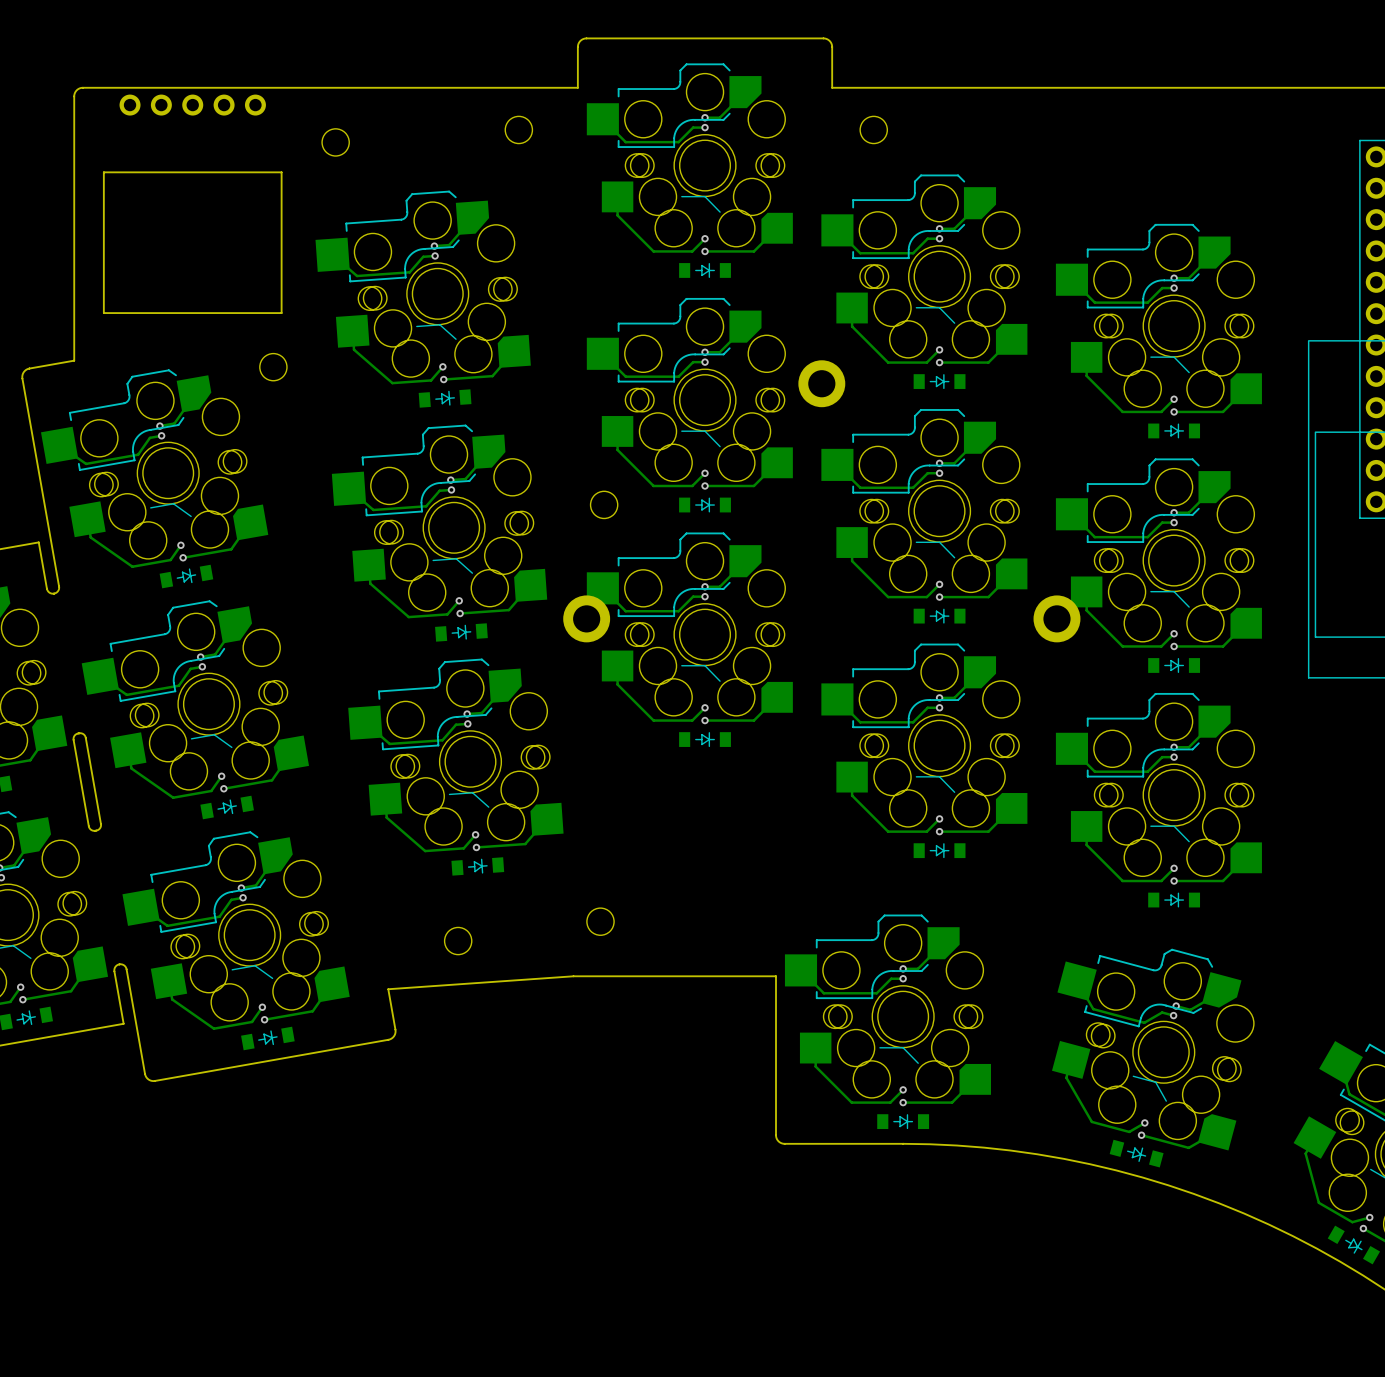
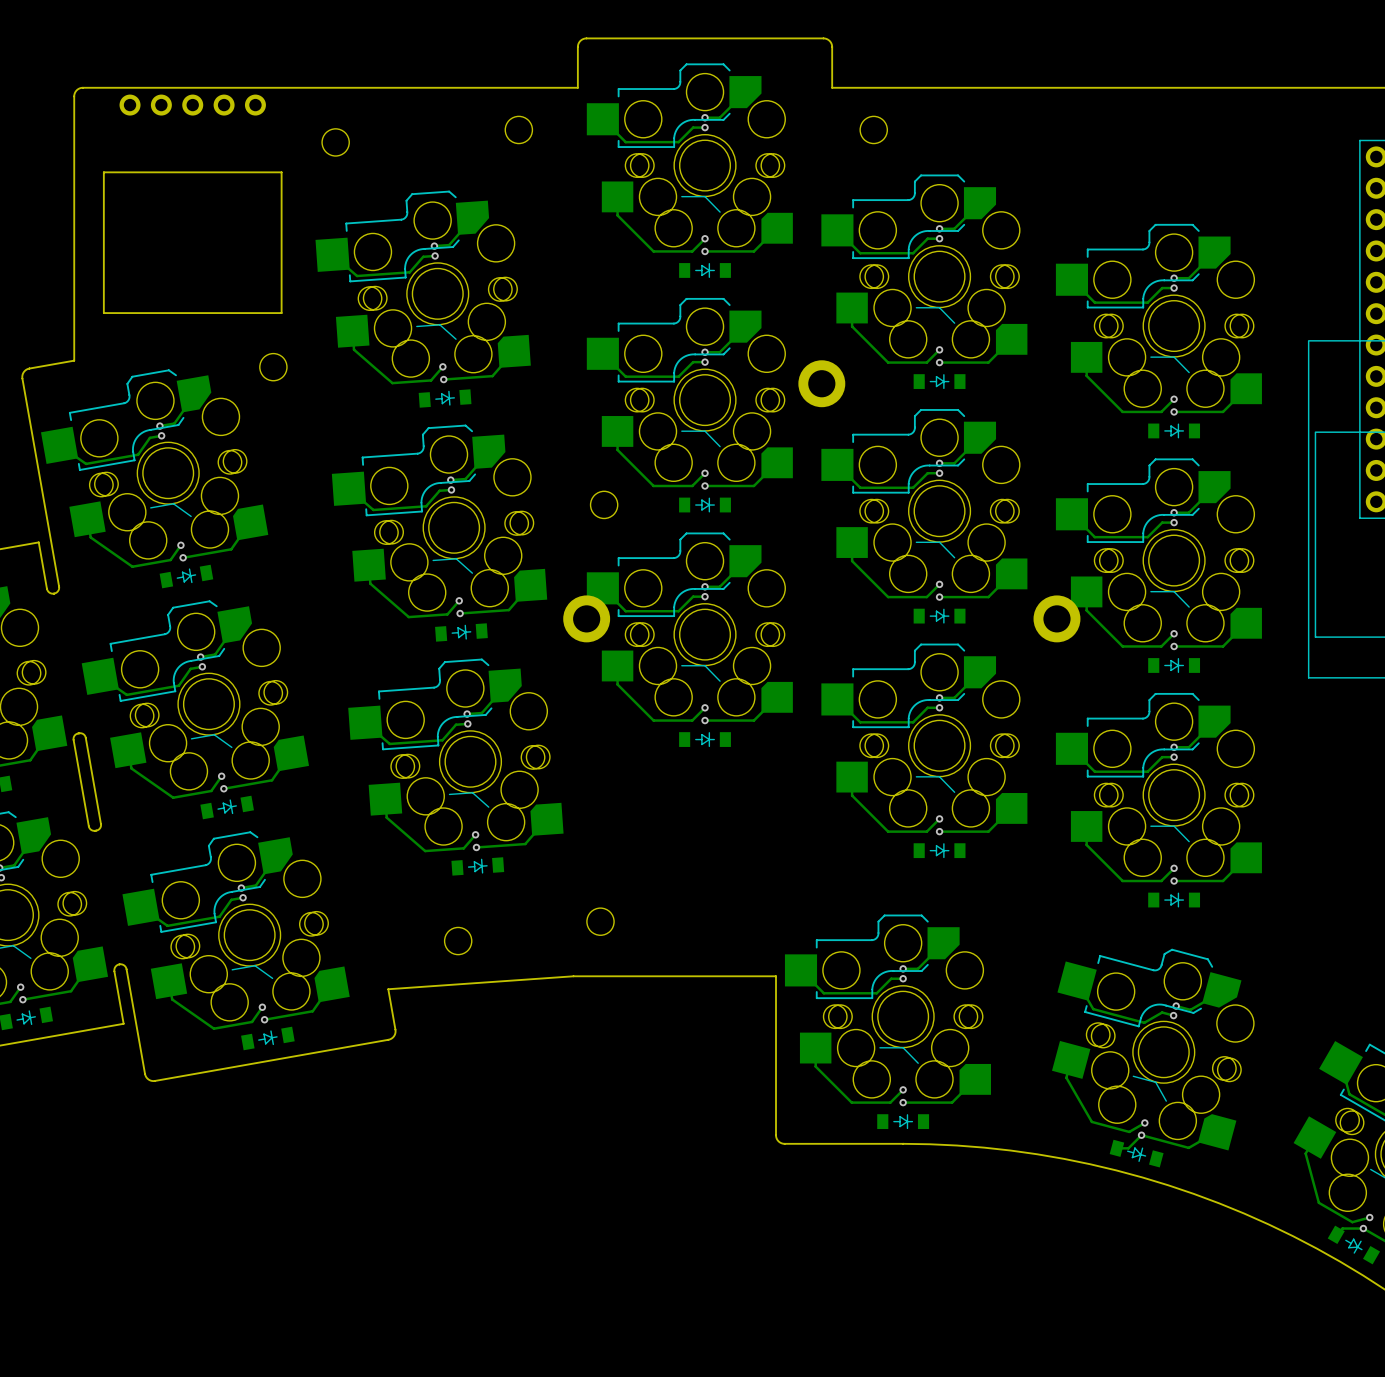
track: none -> (1141, 1135) (1128, 1148) (1116, 1148)
track: none -> (1363, 1228) (1342, 1228) (1336, 1234)

